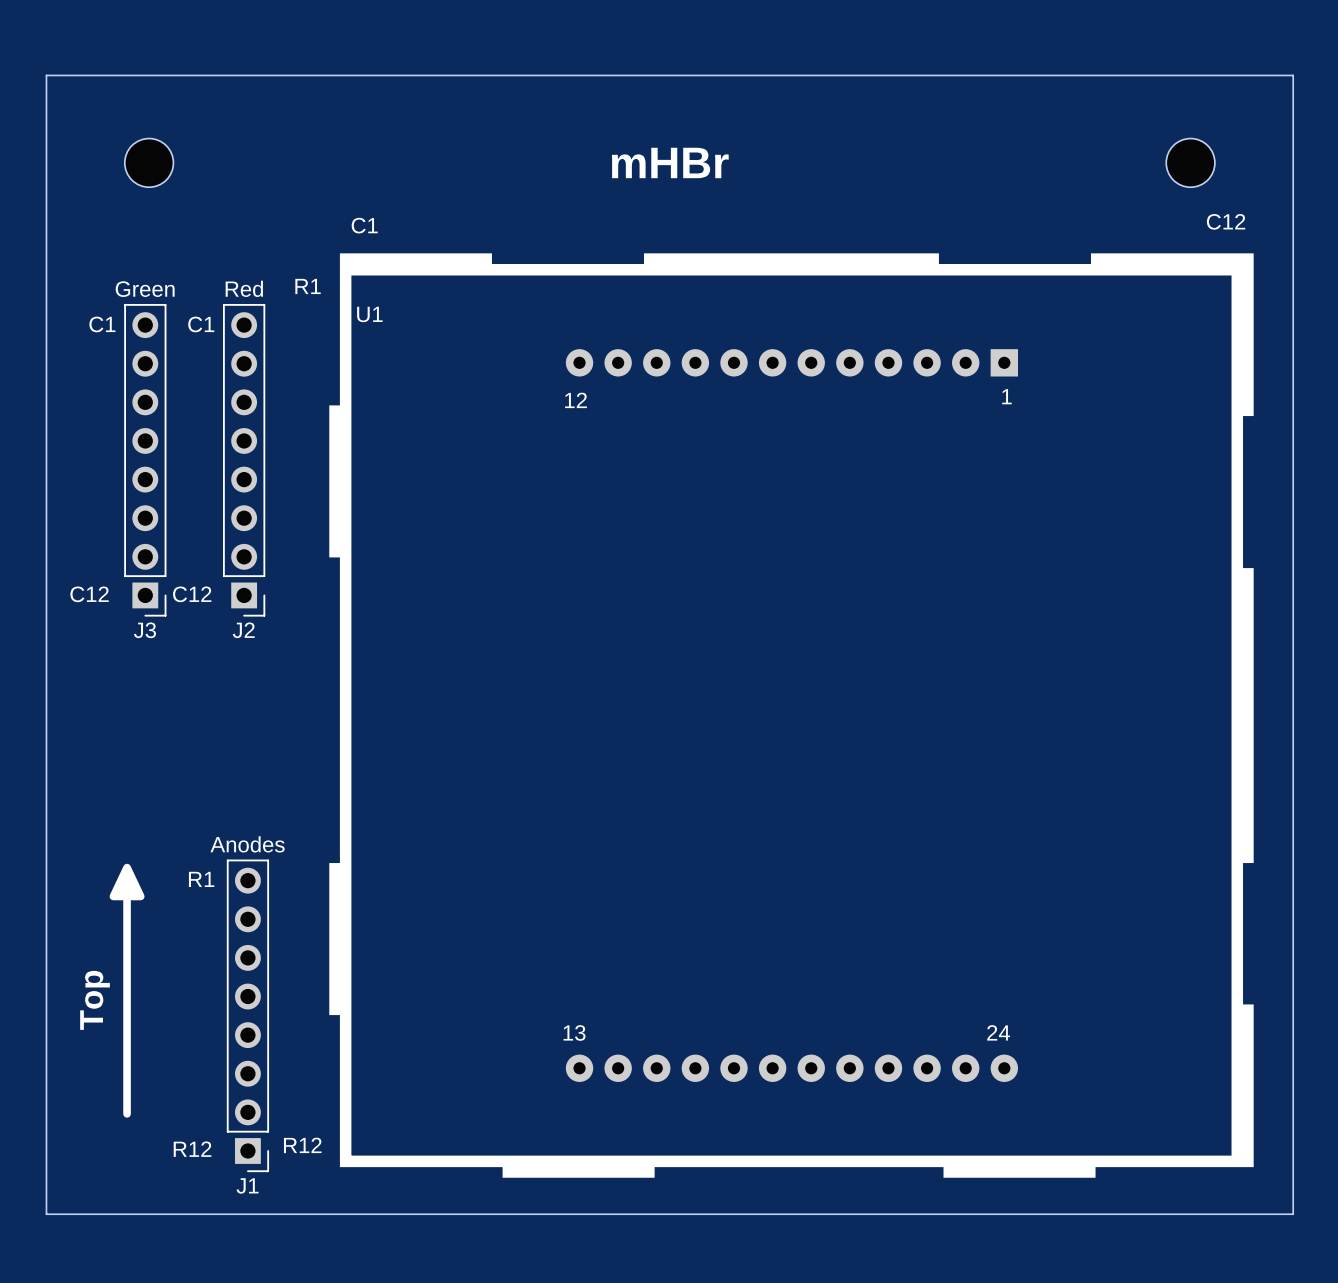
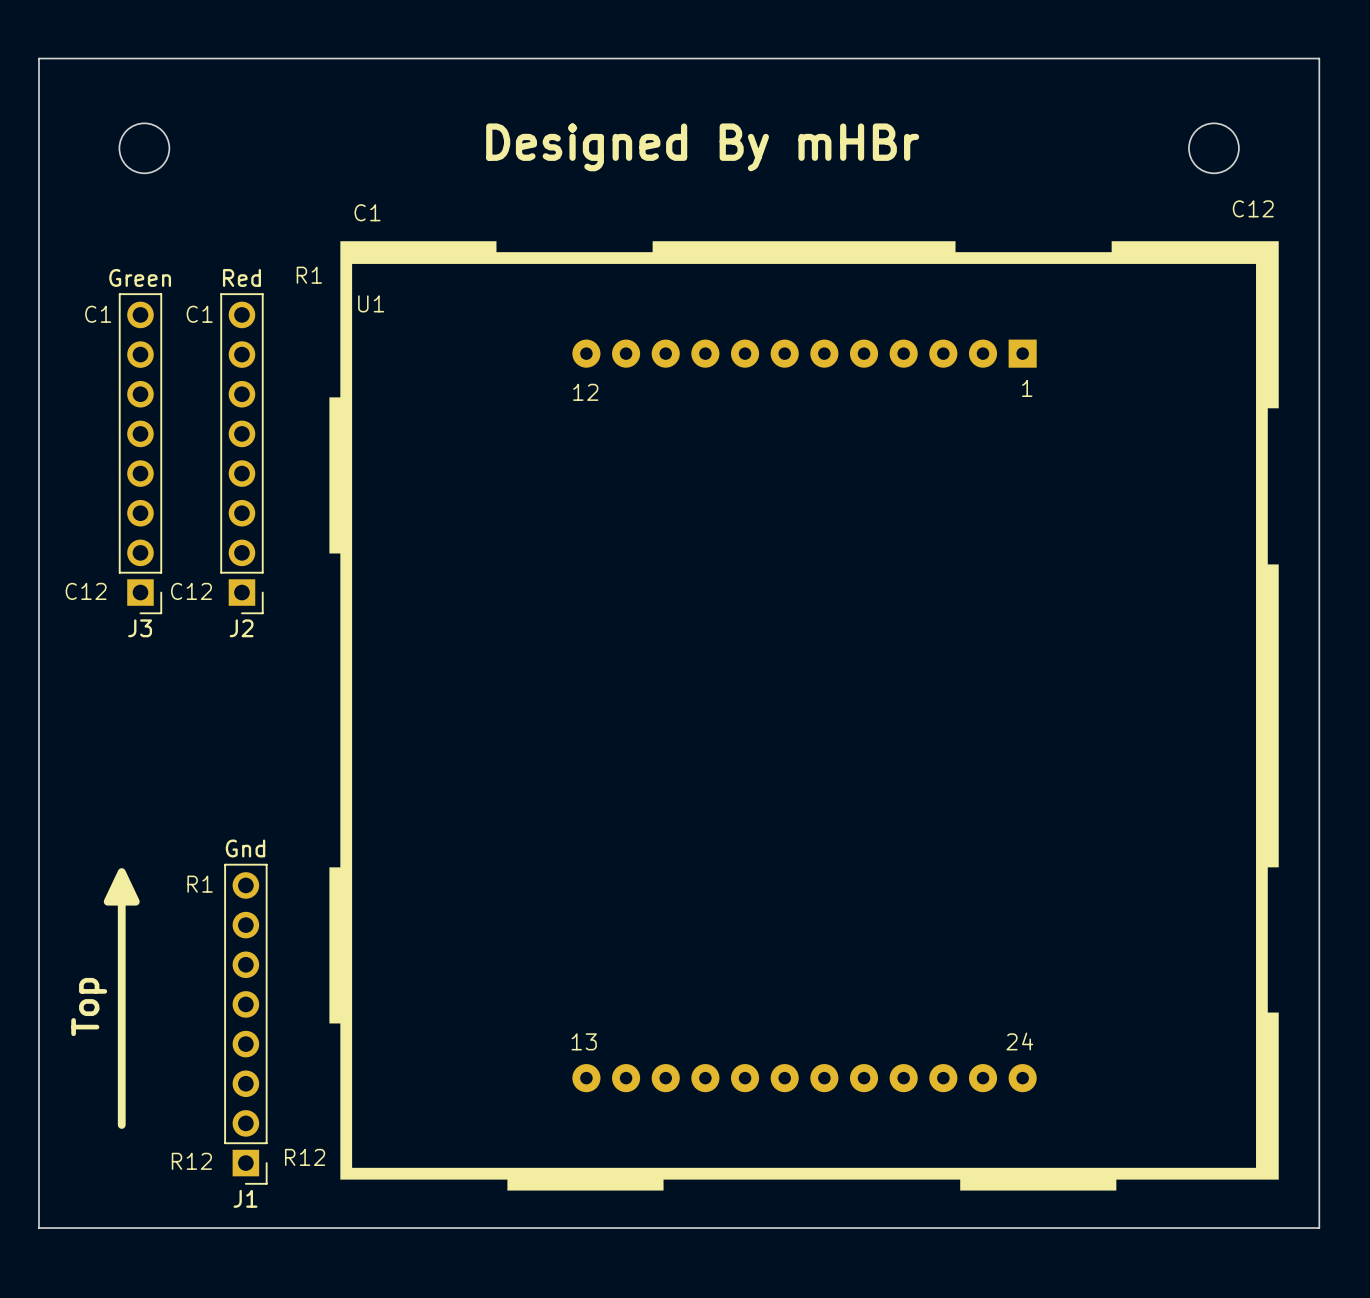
text: none -> Designed By mHBr (702, 147)
text: mHBr (670, 162) -> none
J1 value: Anodes (247, 844) -> Gnd (245, 848)

